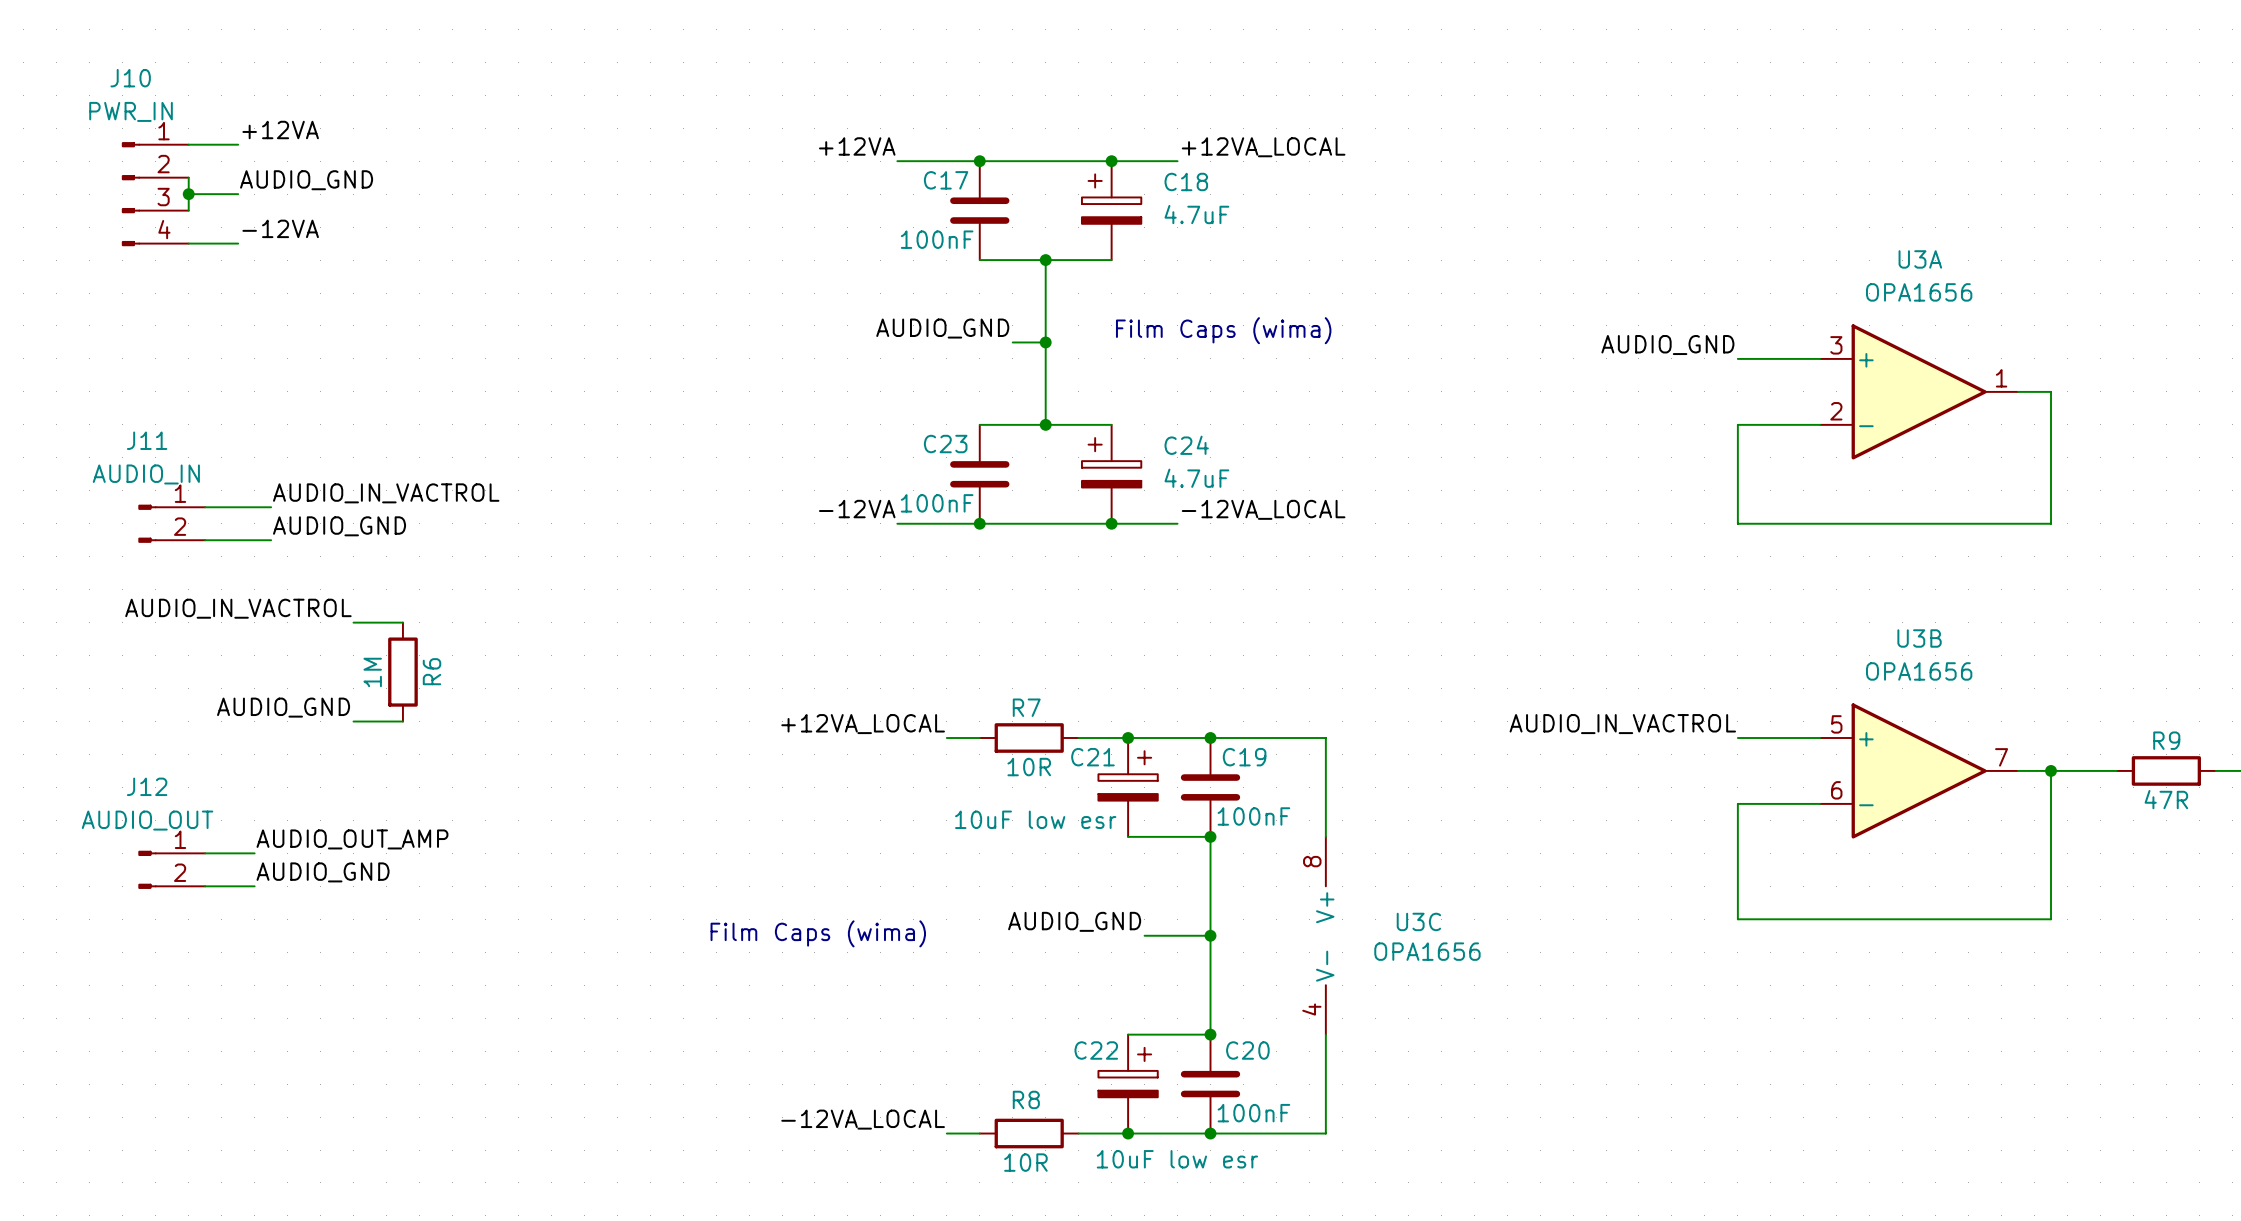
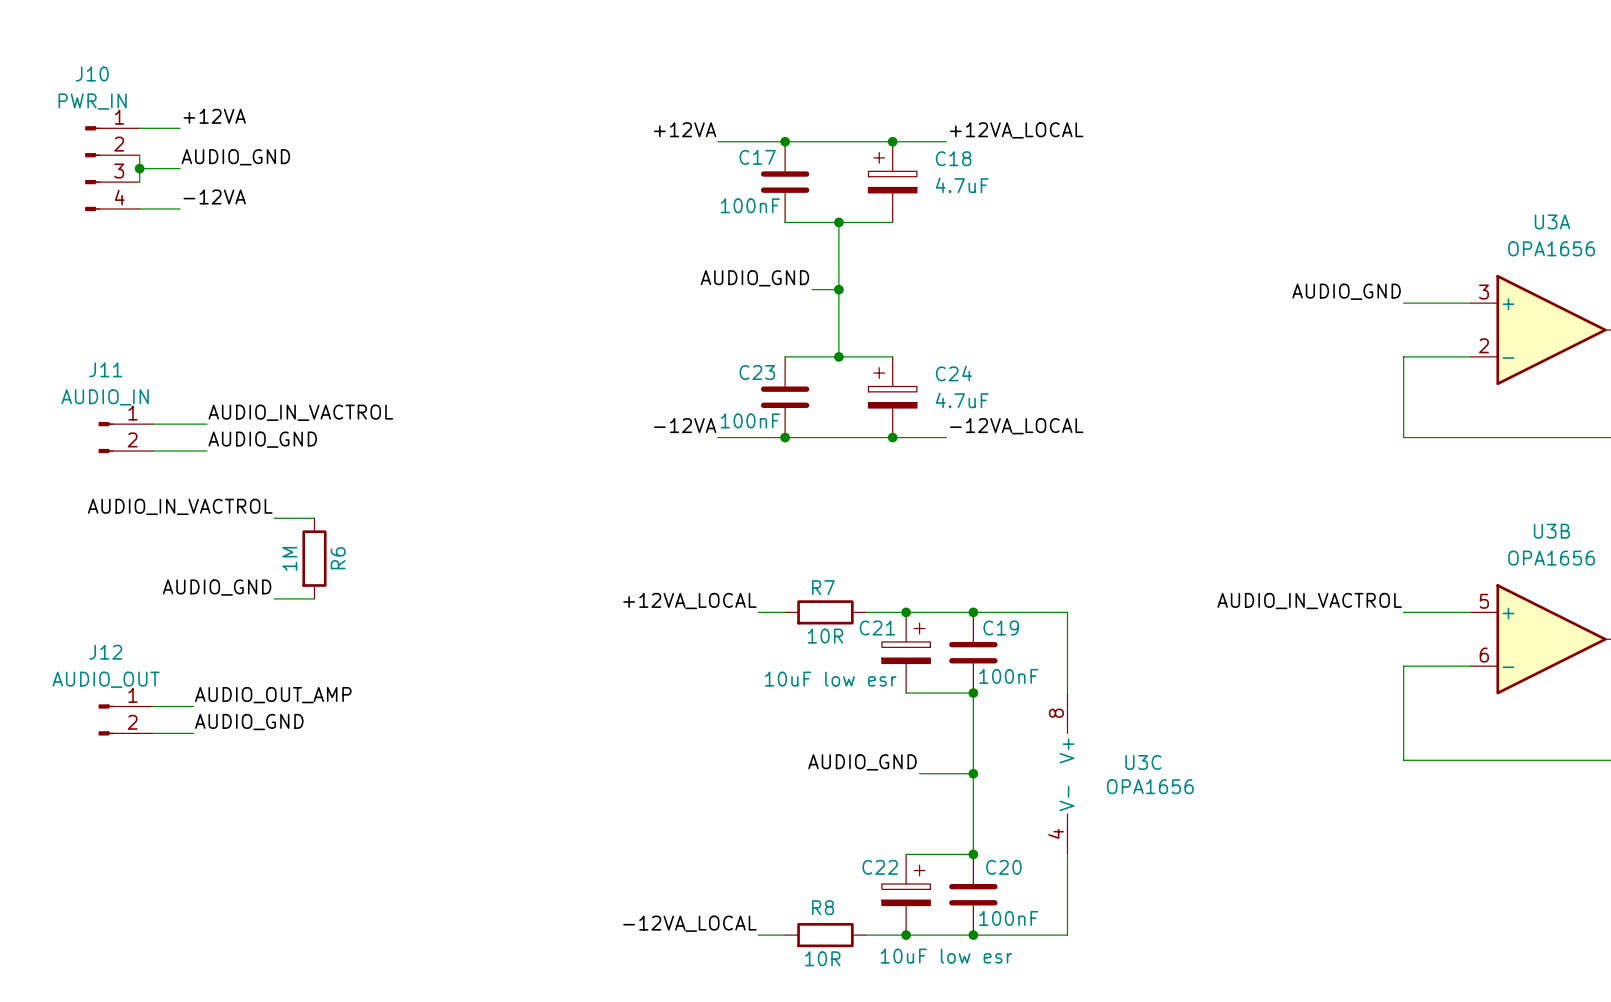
text: Film Caps (wima) (1223, 330) -> none
text: Film Caps (wima) (818, 933) -> none

